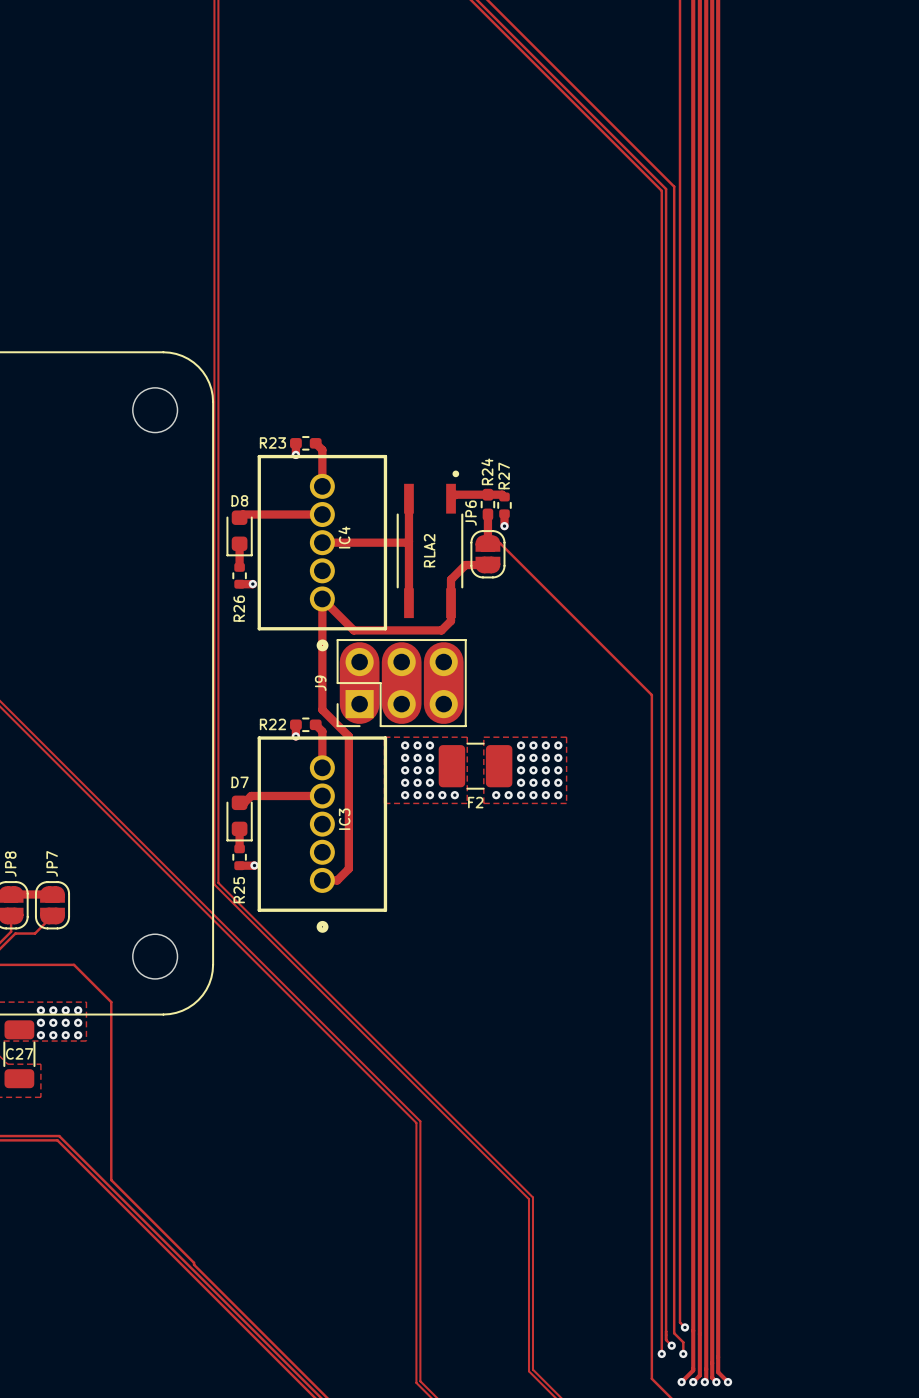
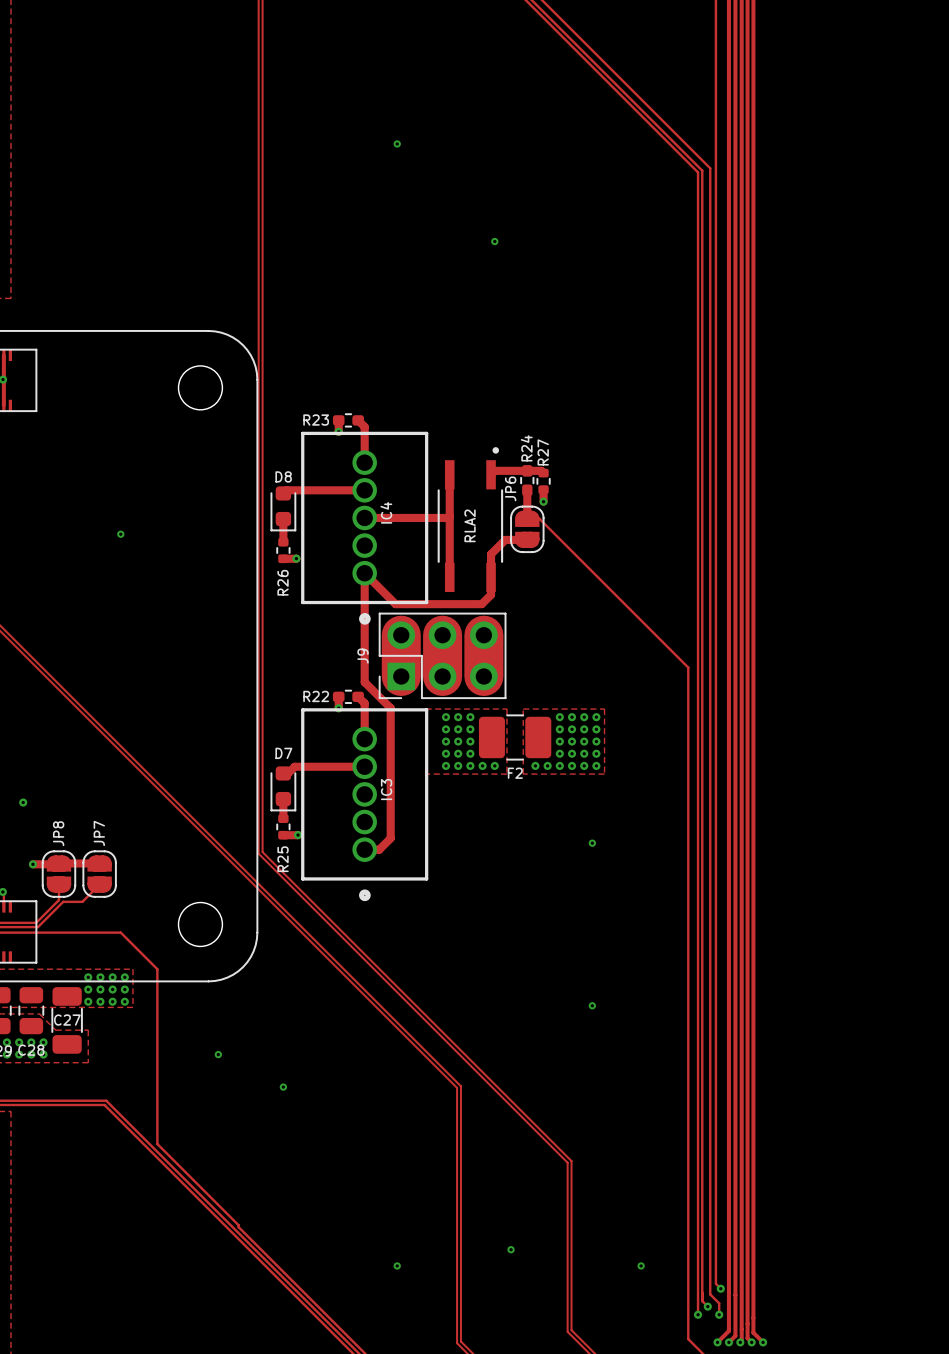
via: none -> (397, 143)
via: none -> (494, 241)
via: none -> (120, 534)
via: none -> (592, 843)
via: none -> (592, 1005)
via: none -> (218, 1054)
via: none -> (283, 1087)
via: none -> (511, 1249)
via: none -> (397, 1265)
via: none -> (641, 1265)

